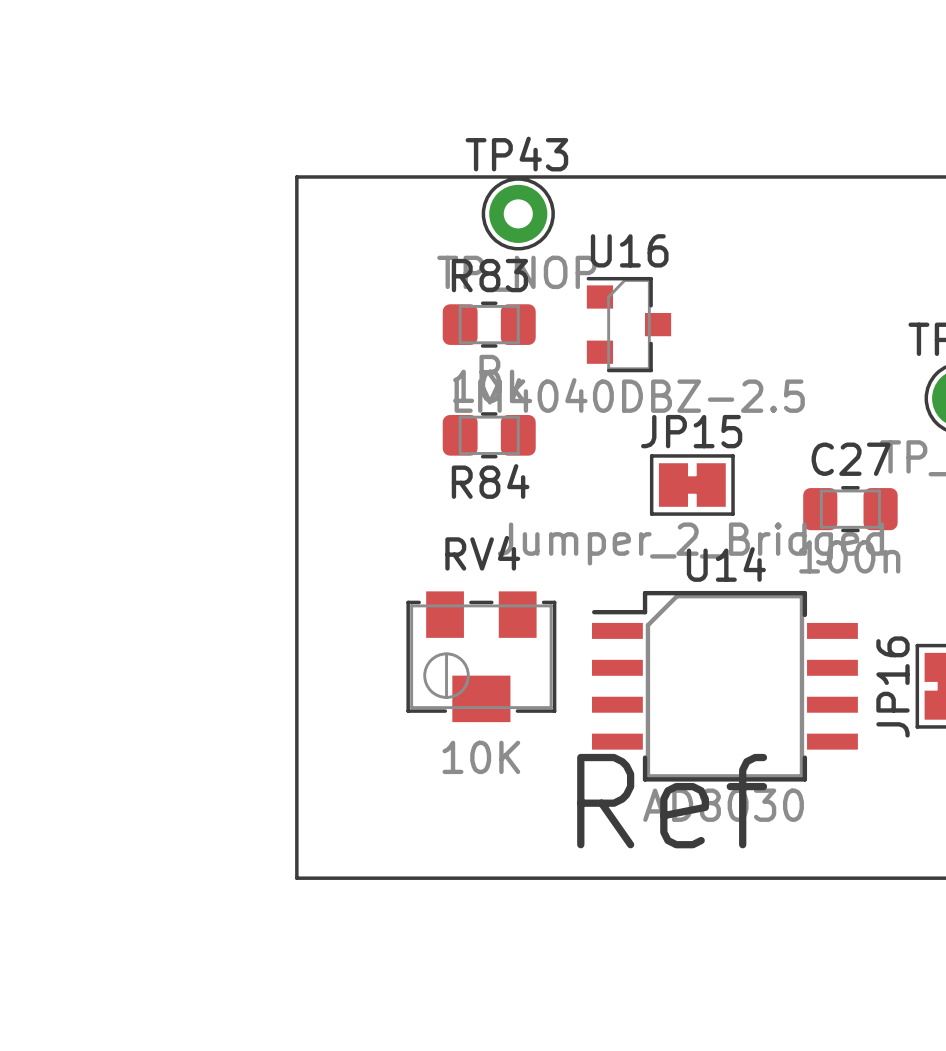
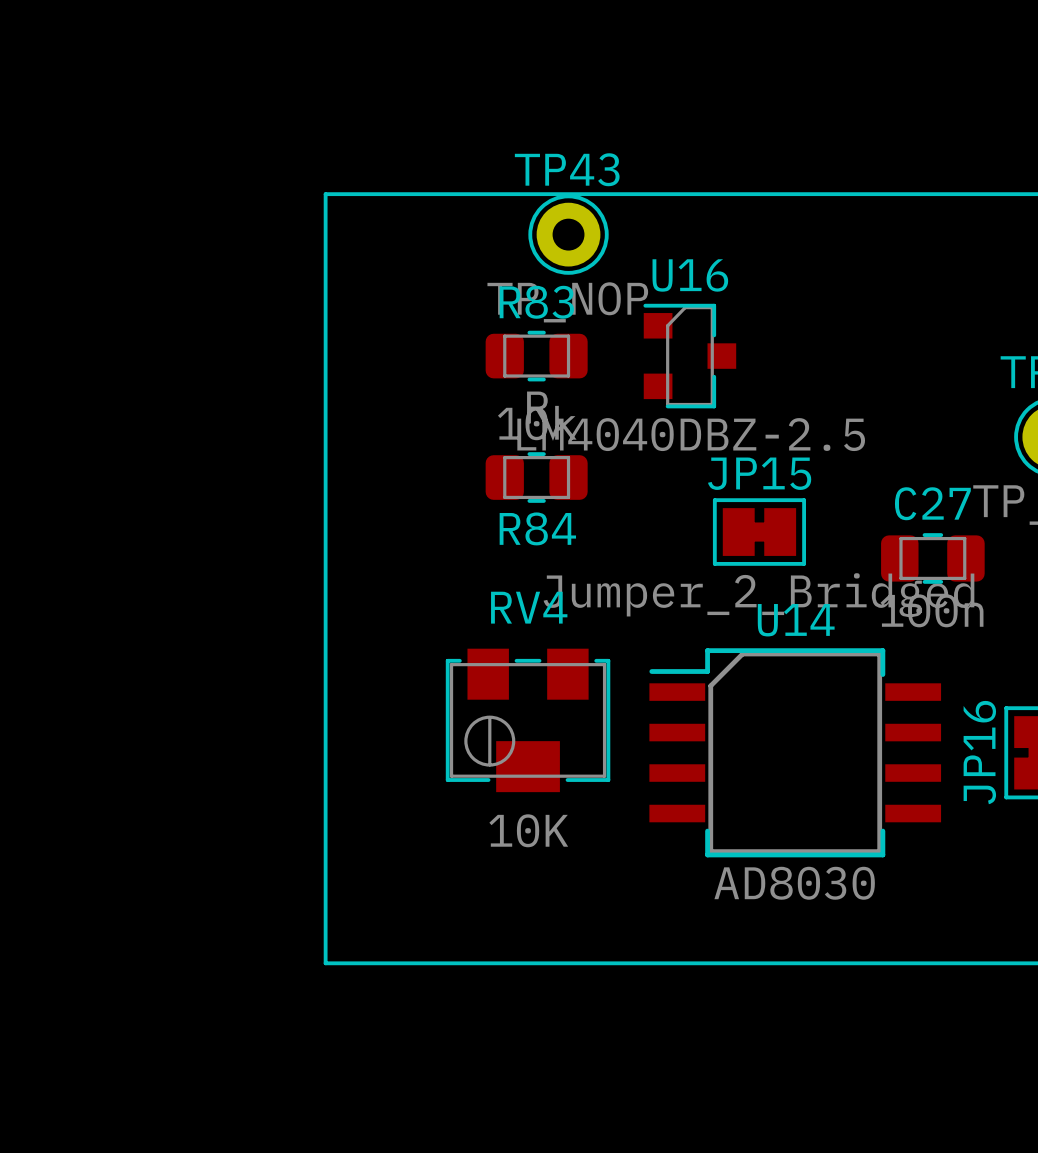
text: Ref (672, 801) -> none

